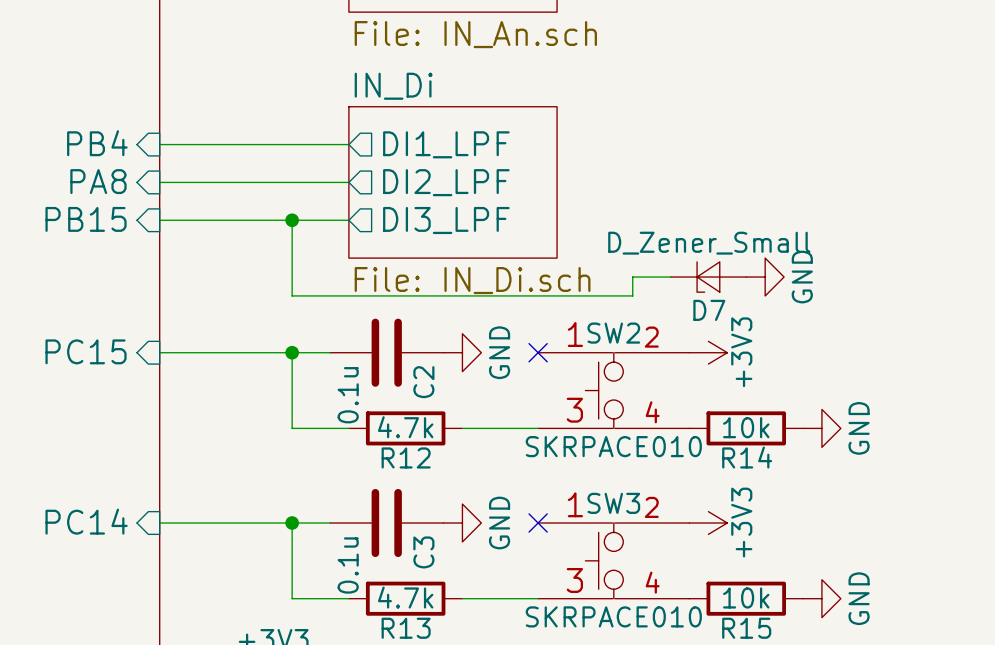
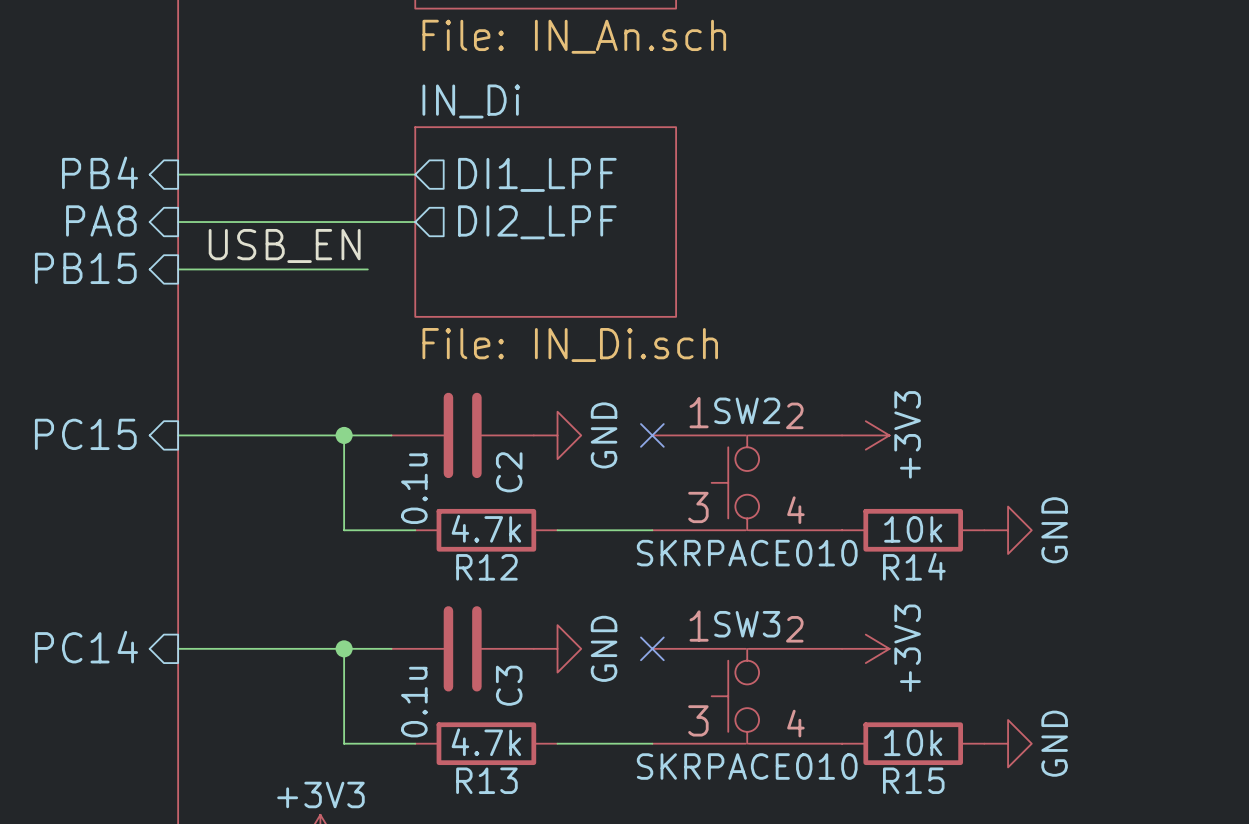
label: none -> USB_EN (284, 245)
wire: (292, 220) (292, 295) (632, 295) (632, 277) (670, 277) -> none
junction: (292, 220) -> none
wire: (311, 220) (348, 220) -> none
sheet pin: DI3_LPF (446, 220) -> none
D7: D_Zener_Small (708, 277) -> none
power symbol: GND (765, 277) -> none

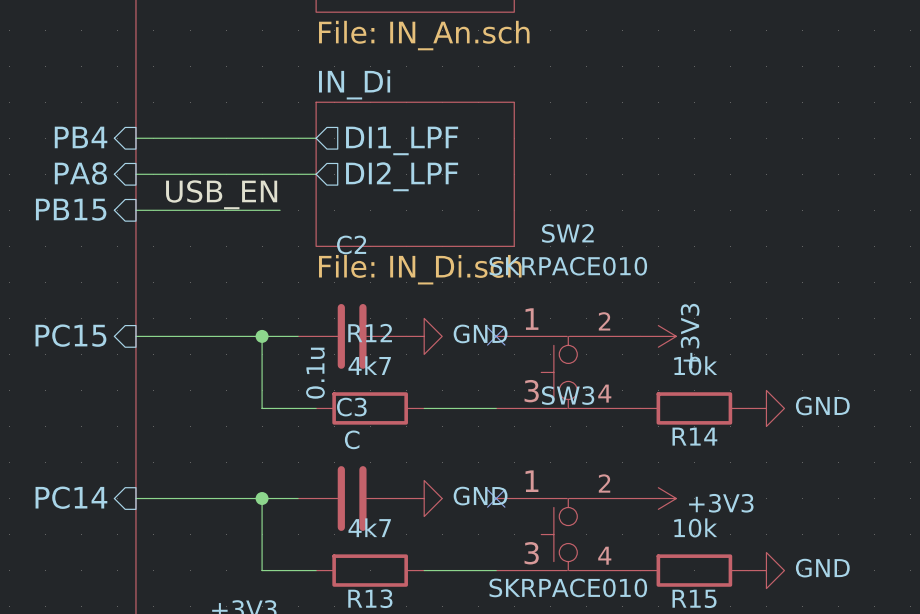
SW2 name position: SW2 (747, 410) -> SW2 (567, 233)
power symbol text rotation: 0° (604, 435) -> 90° clockwise (480, 333)
C2 name rotation: 0° (509, 472) -> 90° clockwise (351, 244)
C2 name position: C2 (509, 472) -> C2 (351, 244)
R12 value: 4.7k (486, 528) -> 4k7 (369, 365)
R14 value position: 10k (913, 529) -> 10k (695, 365)
power symbol text rotation: 0° (1054, 530) -> 90° clockwise (822, 405)
SW2 value position: SKRPACE010 (747, 553) -> SKRPACE010 (568, 266)
R12 name position: R12 (486, 567) -> R12 (370, 333)
SW3 name position: SW3 (747, 624) -> SW3 (568, 395)
power symbol text rotation: 0° (604, 648) -> 90° clockwise (480, 496)
power symbol text rotation: 0° (907, 648) -> 90° clockwise (721, 503)
C3 name rotation: 0° (509, 685) -> 90° clockwise (351, 407)
C3 name position: C3 (509, 685) -> C3 (351, 407)
C3 value: 0.1u (414, 702) -> C (352, 439)
R13 value: 4.7k (486, 742) -> 4k7 (369, 527)
R15 value position: 10k (913, 742) -> 10k (695, 527)
power symbol text rotation: 0° (1054, 743) -> 90° clockwise (822, 568)

